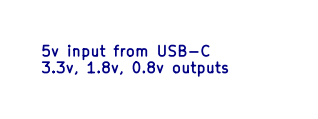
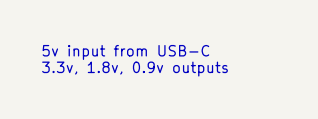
text: 3.3v, 1.8v, 0.8v outputs (135, 69) -> 3.3v, 1.8v, 0.9v outputs (135, 69)

